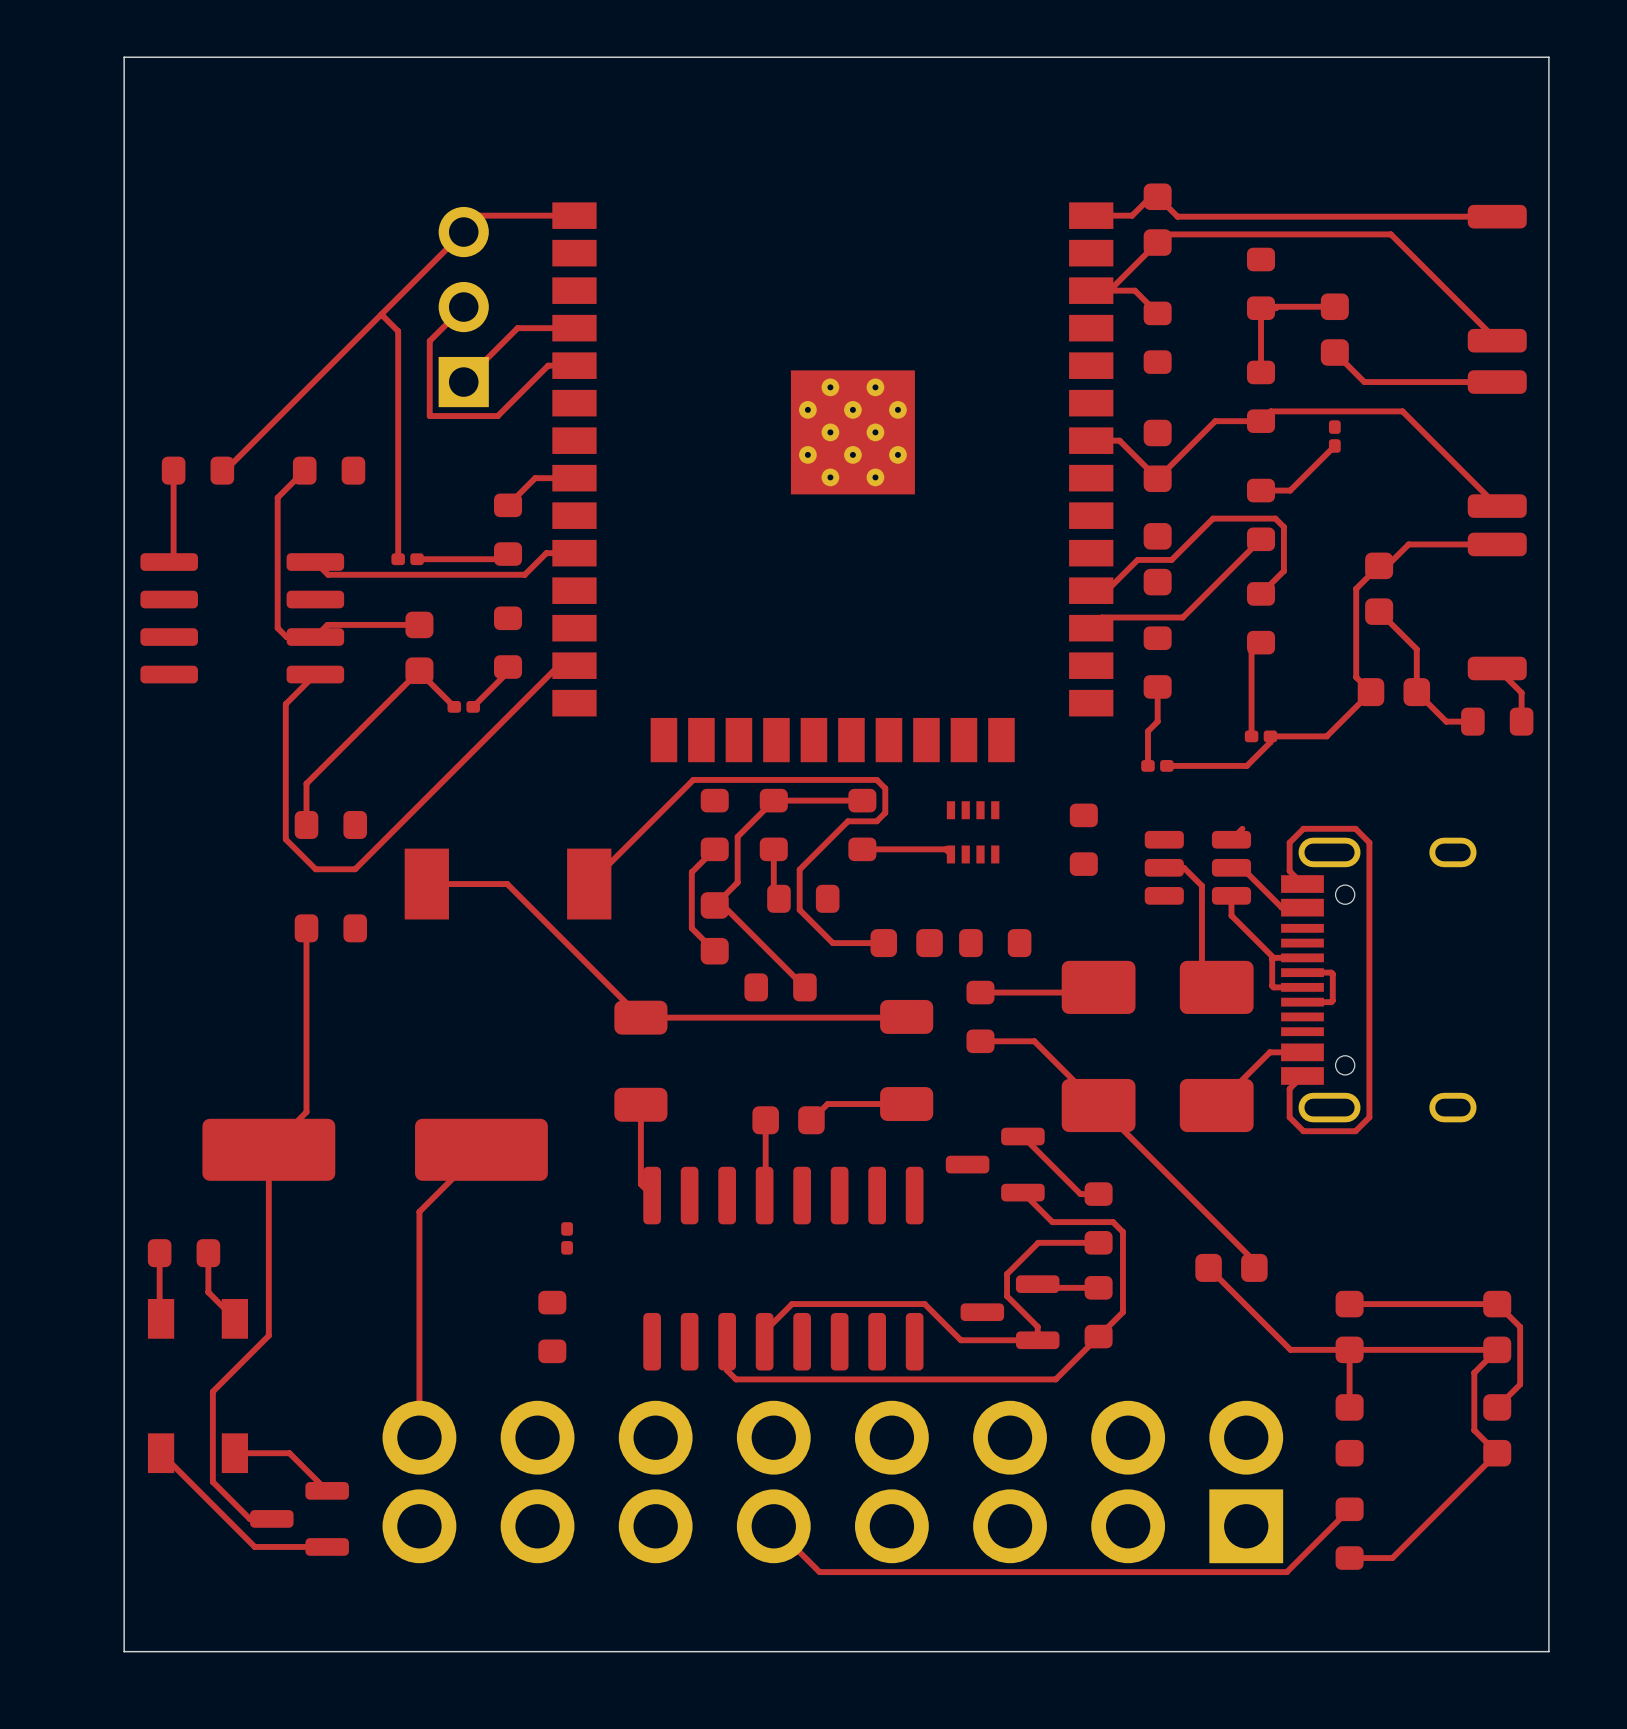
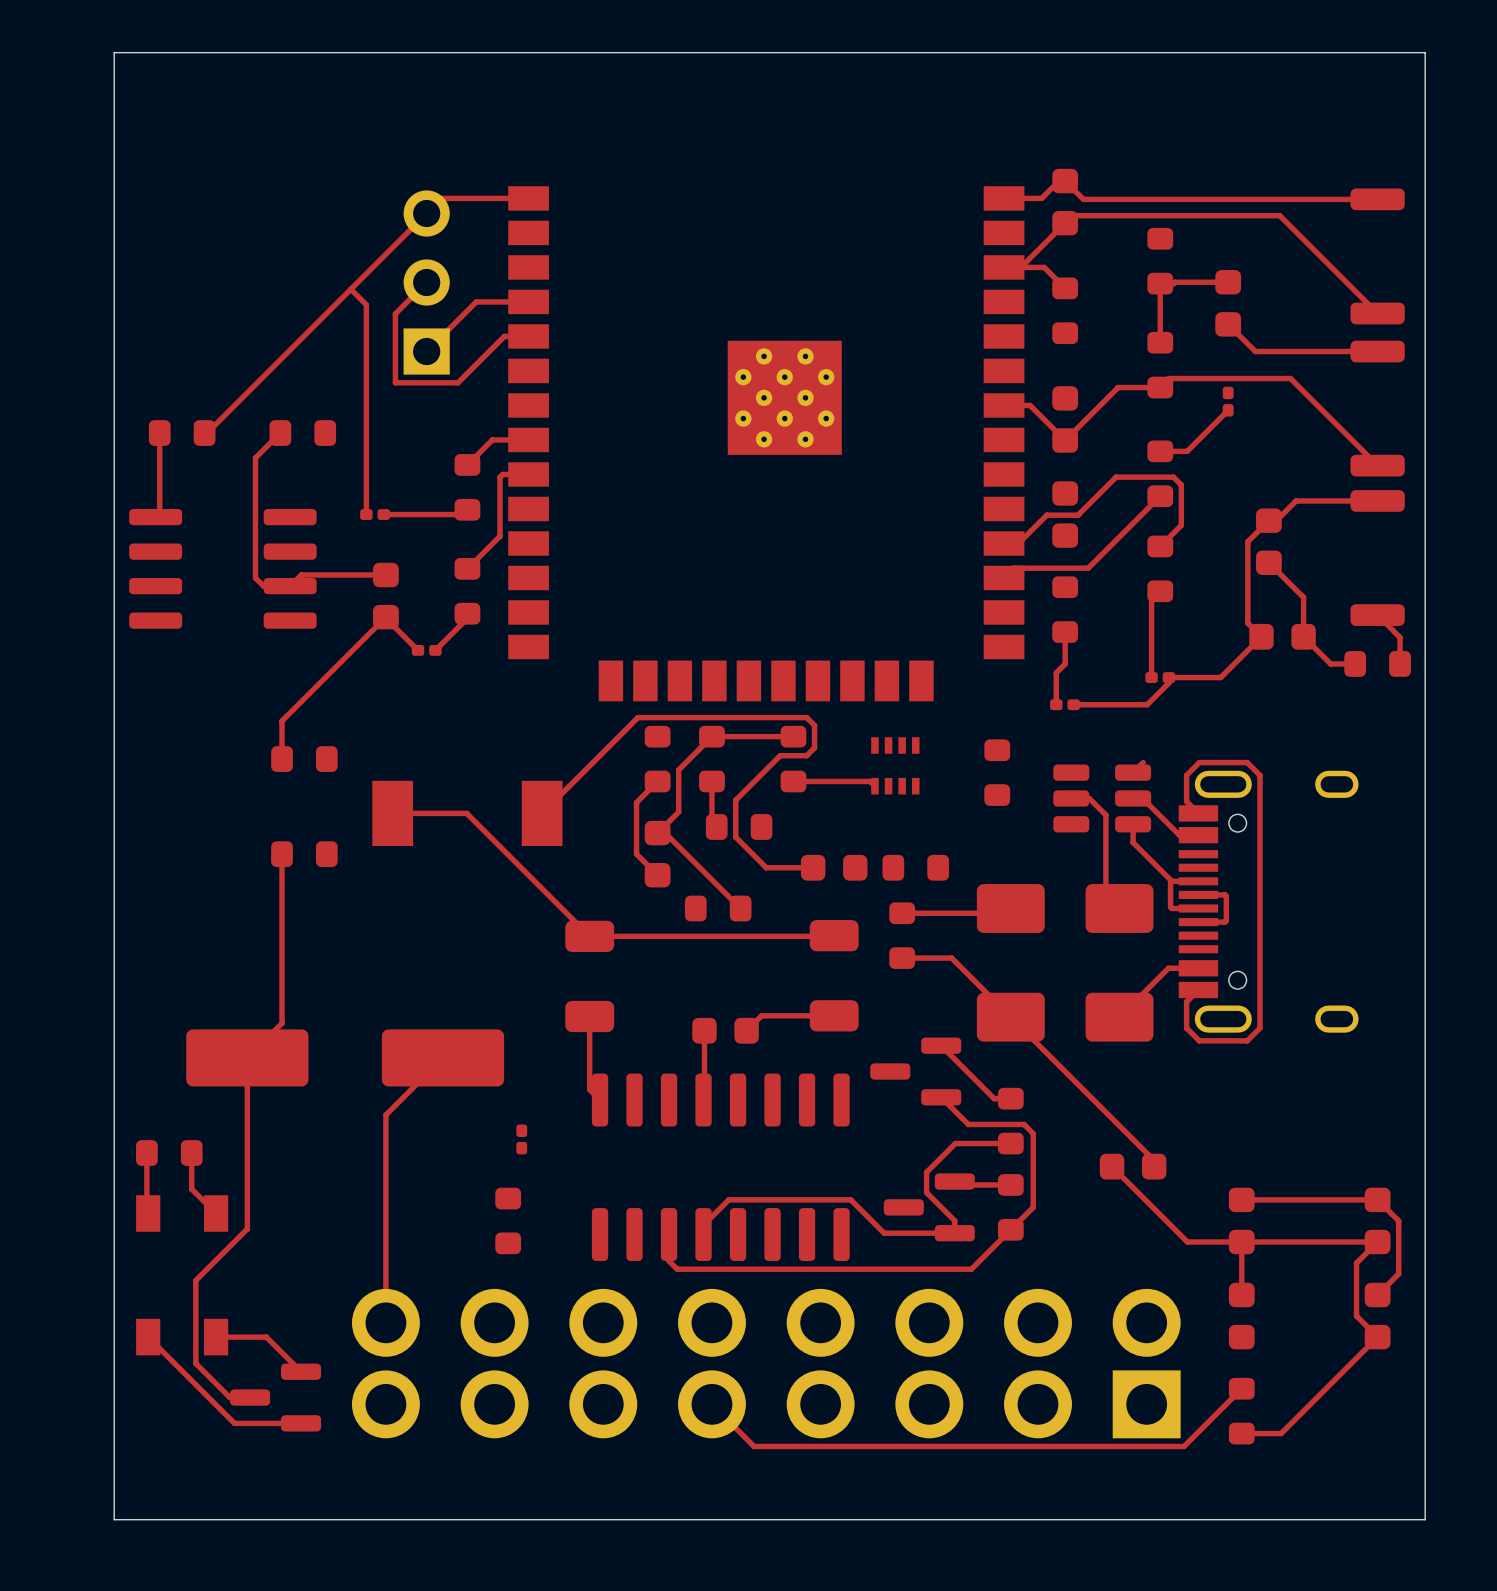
top track: none -> (528, 474) (502, 474) (500, 477) (500, 536) (467, 568)
top track: (590, 553) (546, 553) (524, 574) (328, 574) (315, 562) -> none
top track: (574, 665) (558, 665) (355, 869) (315, 869) (285, 839) (285, 704) (315, 674) -> none

